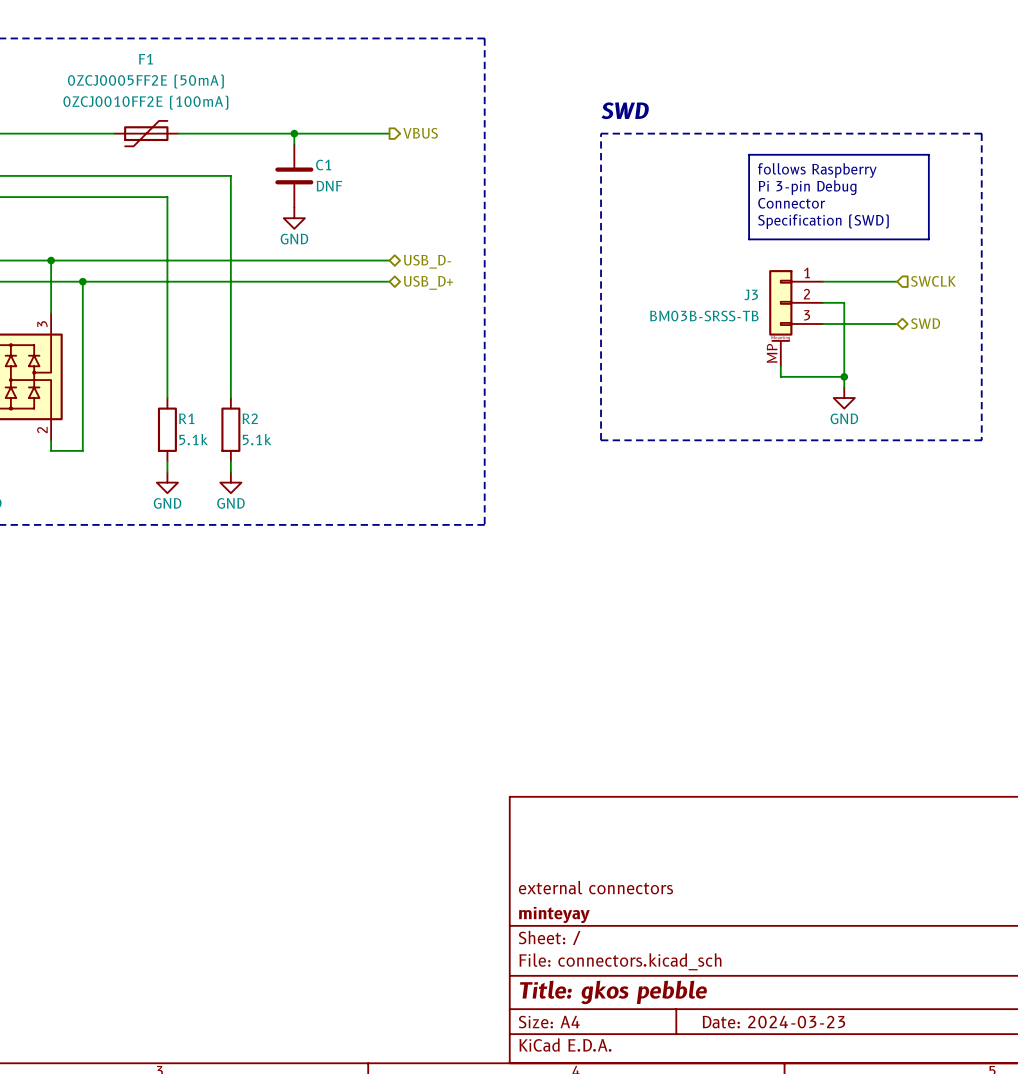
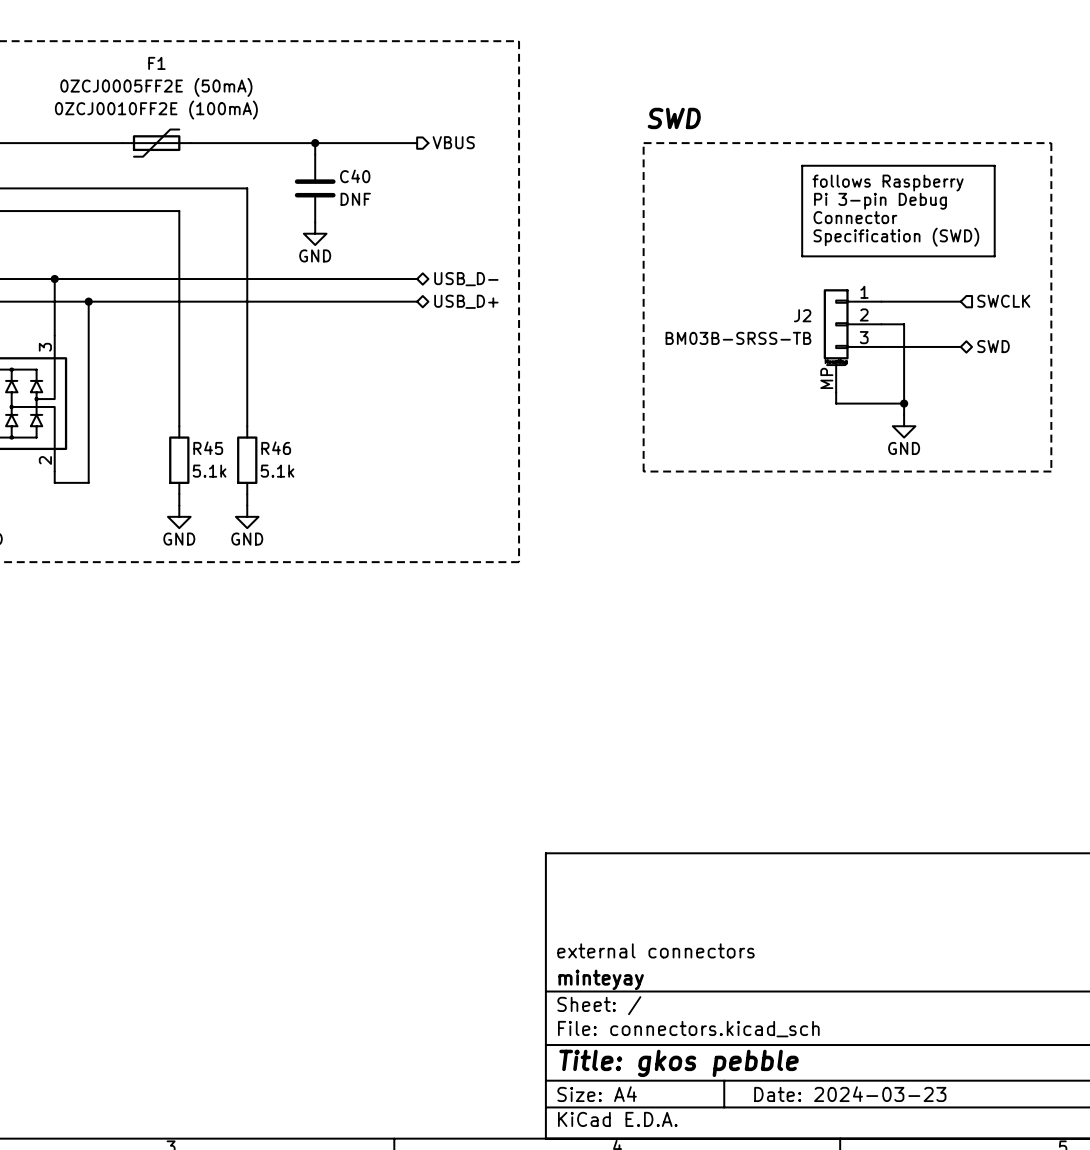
C1 name: C1 (323, 165) -> C40 (355, 176)
J3 name: J3 (751, 294) -> J2 (802, 315)
R1 name: R1 (186, 418) -> R45 (208, 448)
R2 name: R2 (250, 418) -> R46 (276, 448)

